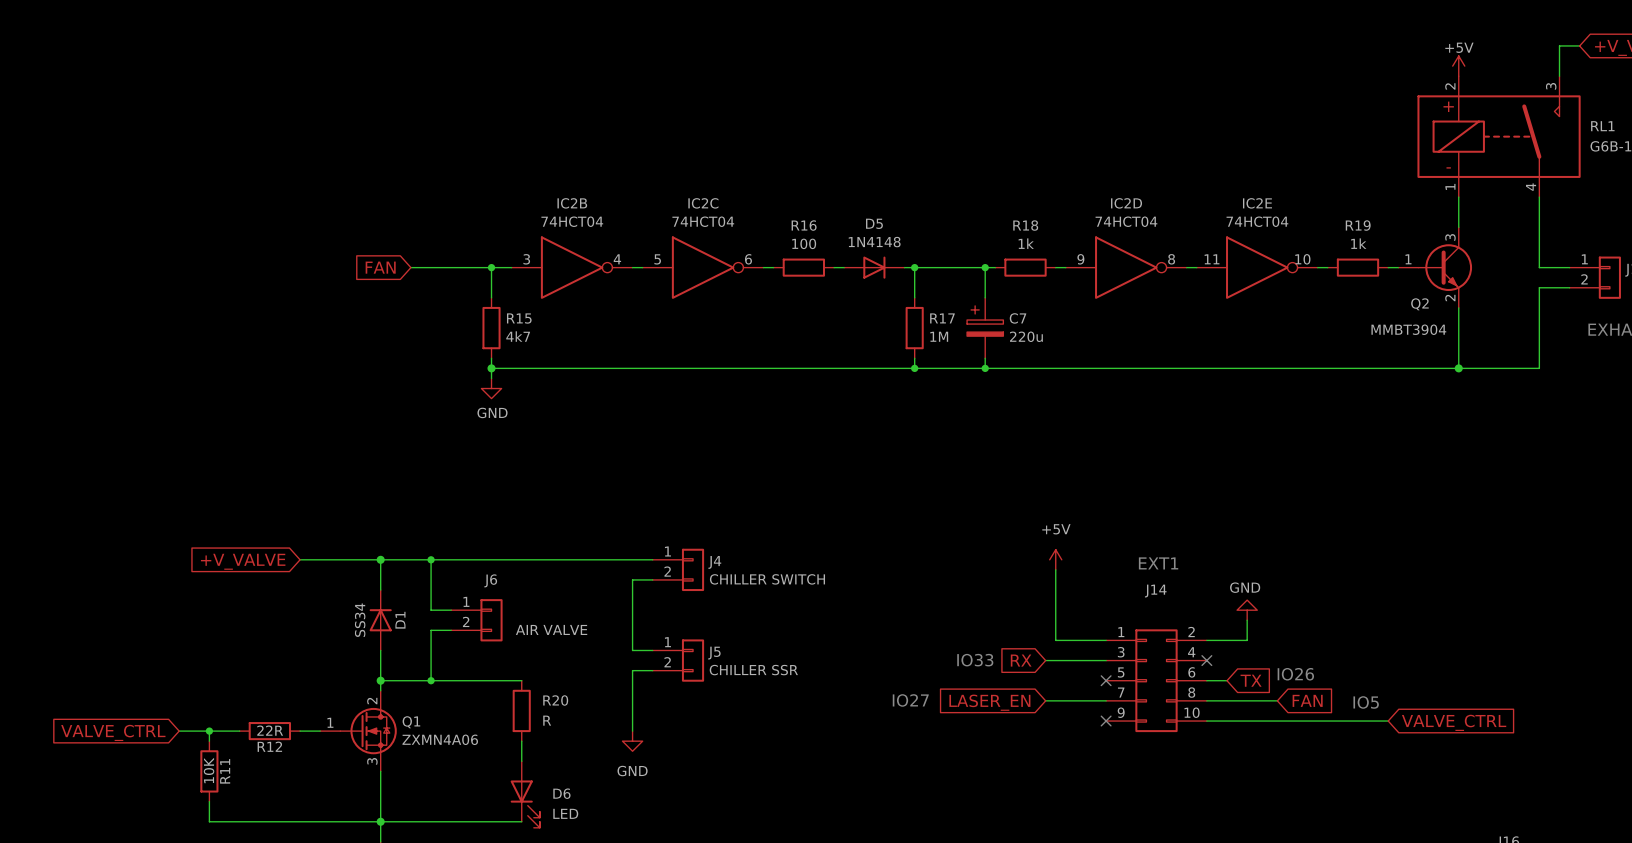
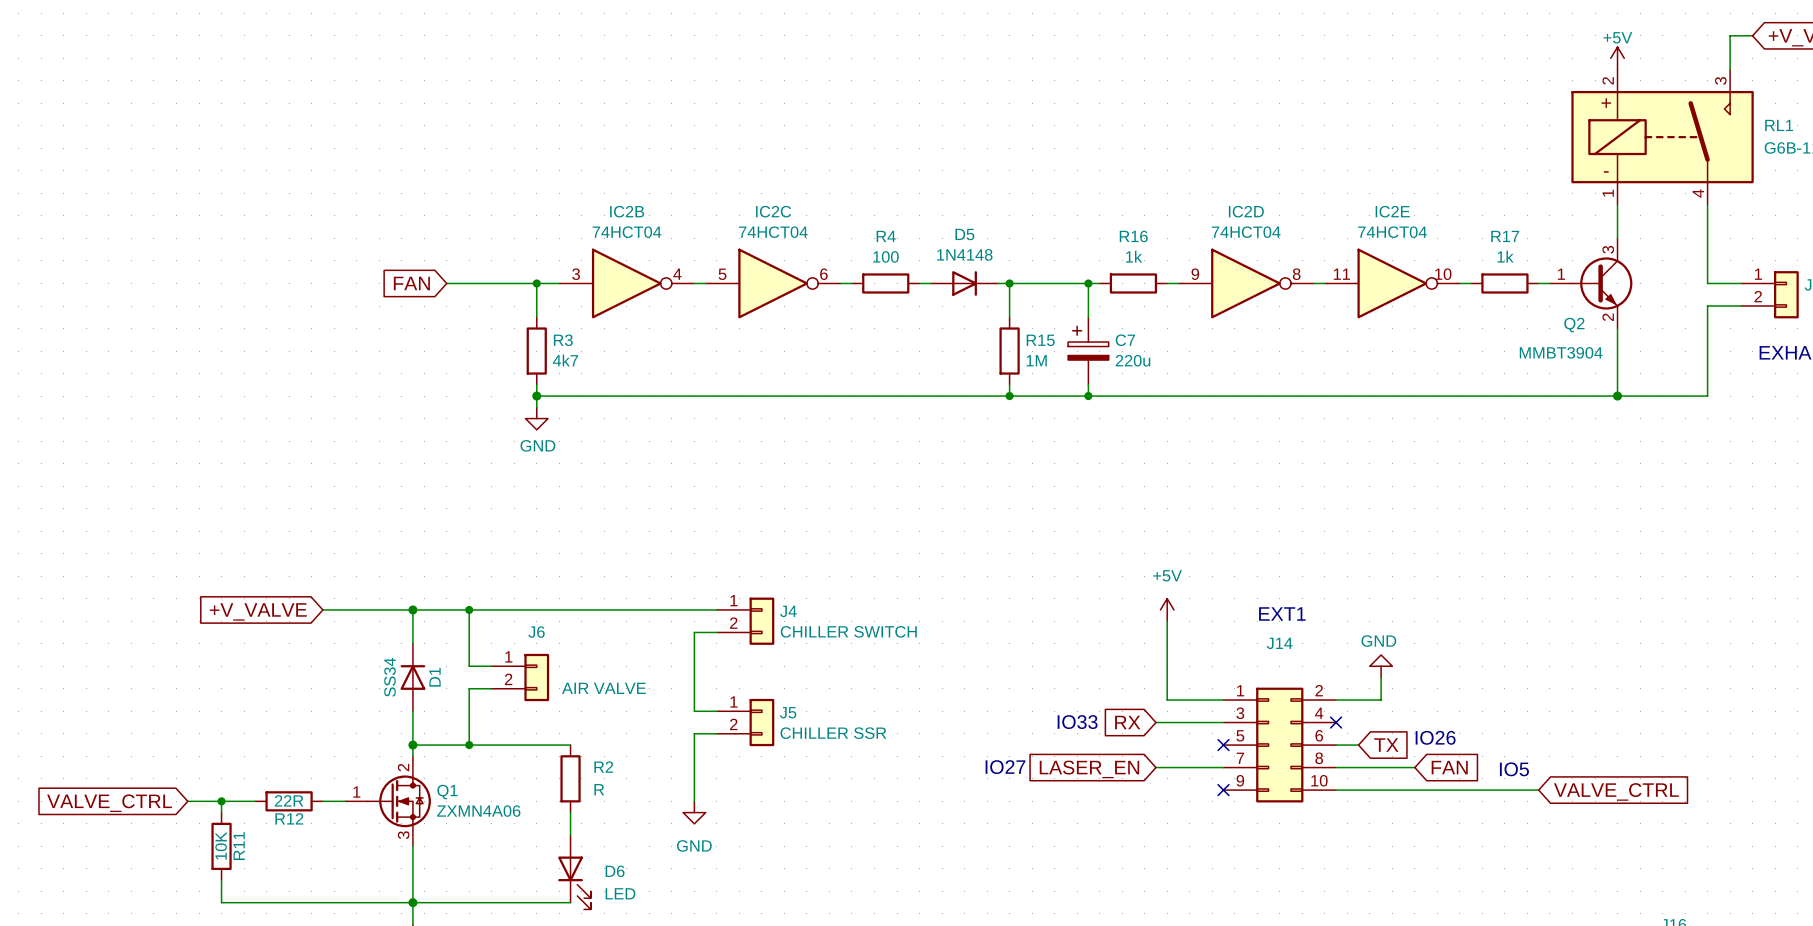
R16 name: R16 (804, 225) -> R4 (886, 236)
R18 name: R18 (1025, 225) -> R16 (1133, 236)
R19 name: R19 (1358, 225) -> R17 (1505, 236)
R15 name: R15 (519, 318) -> R3 (563, 340)
R17 name: R17 (942, 318) -> R15 (1040, 340)
R20 name: R20 (555, 700) -> R2 (603, 767)

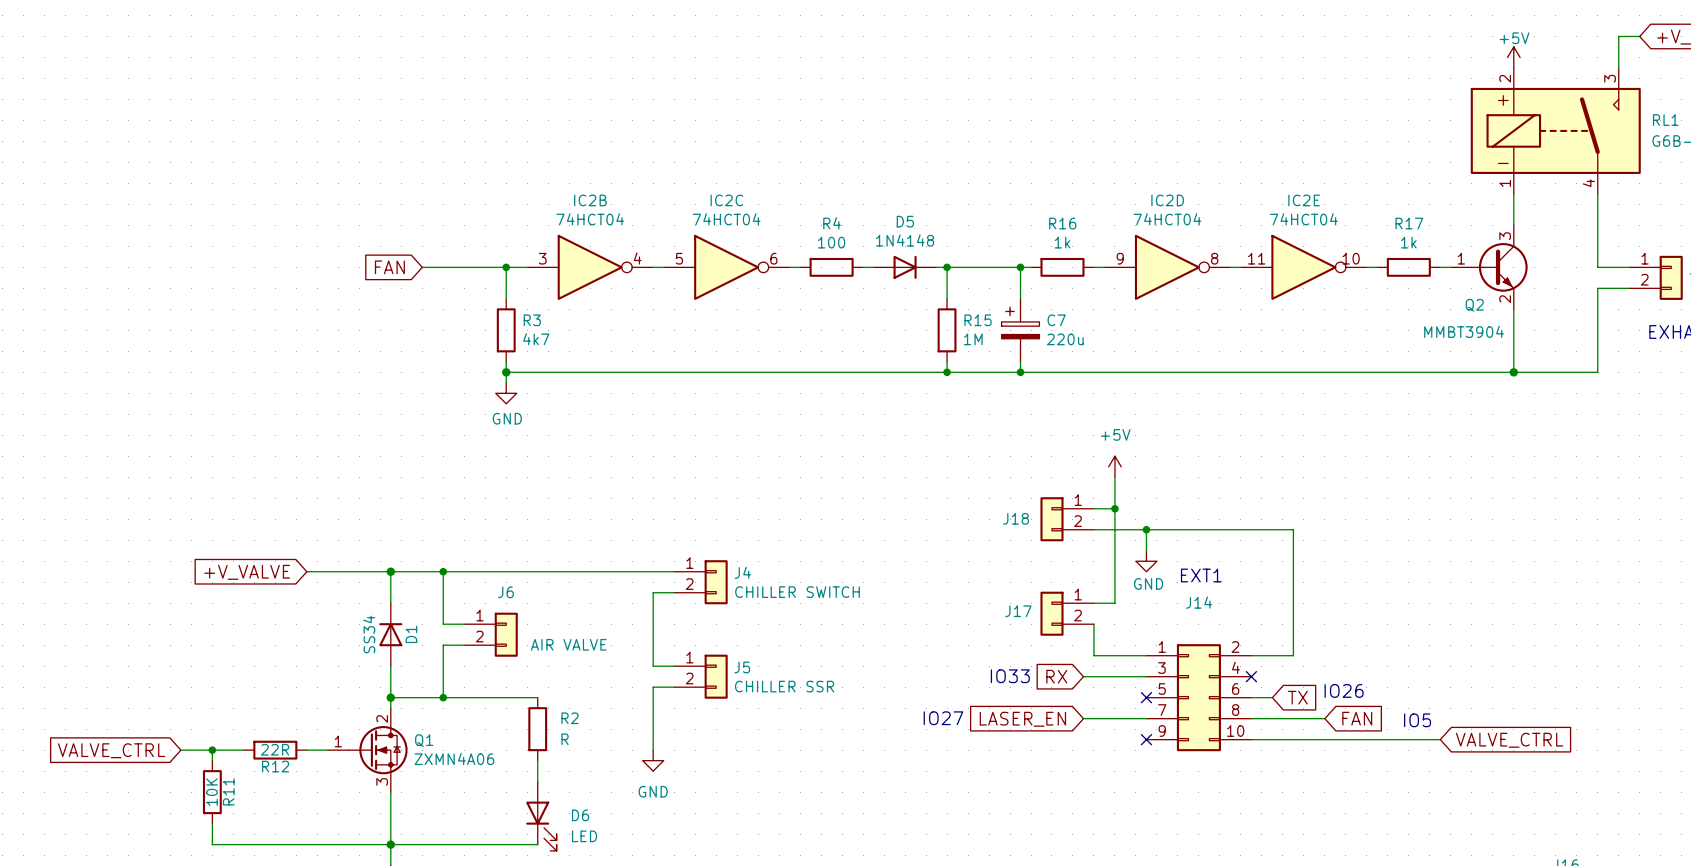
wire: none -> (1114, 477) (1114, 603) (1093, 603)
wire: none -> (1093, 508) (1114, 508)
junction: none -> (1114, 508)
J18: none -> (1067, 519)
wire: none -> (1093, 529) (1293, 529) (1293, 634)
wire: none -> (1146, 529) (1146, 550)
junction: none -> (1146, 529)
power symbol position: +5V (1167, 609) -> +5V (1114, 466)
wire: (1167, 621) (1167, 666) -> none
J17: none -> (1067, 613)
power symbol rotation: 0° (1381, 666) -> 180° (1146, 561)
power symbol position: GND (1381, 666) -> GND (1146, 561)

